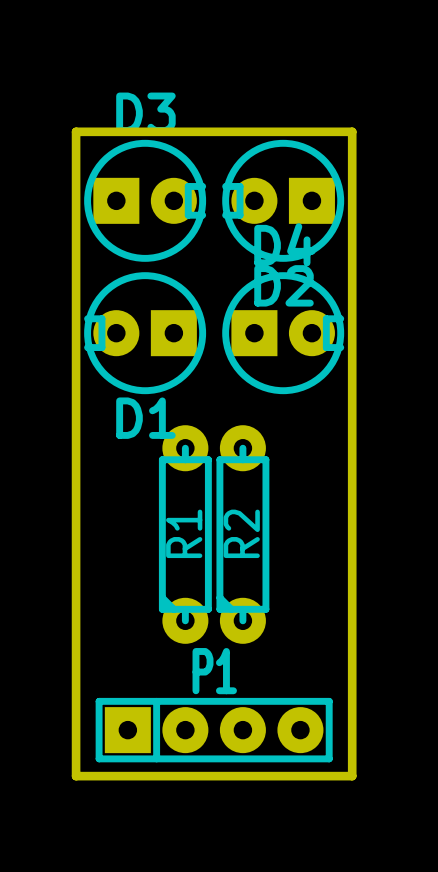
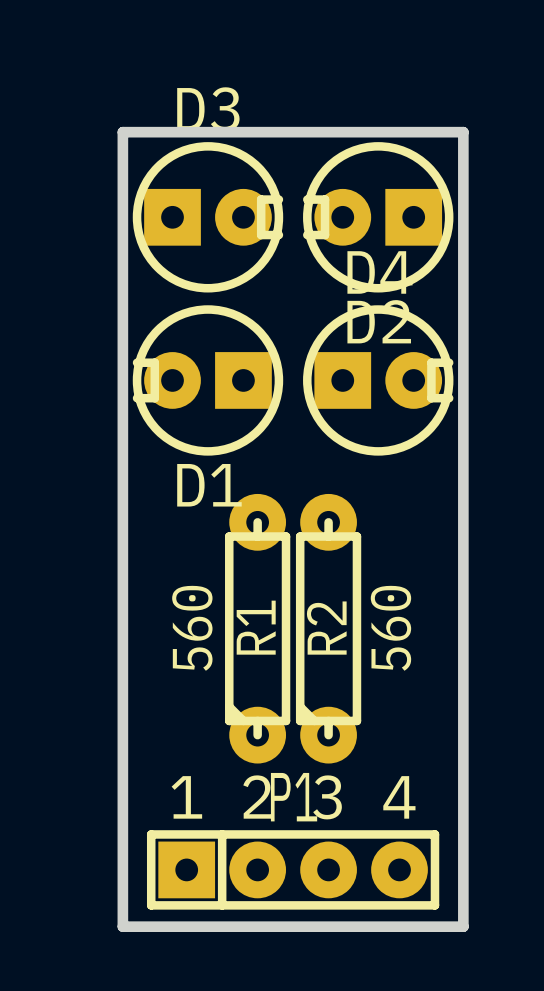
R1 value: none -> 560 (192, 628)
R2 value: none -> 560 (390, 628)
P1 text: none -> 4 (399, 797)
P1 text: none -> 1 (186, 797)
P1 text: none -> 2 (257, 797)
P1 text: none -> 3 (327, 797)

